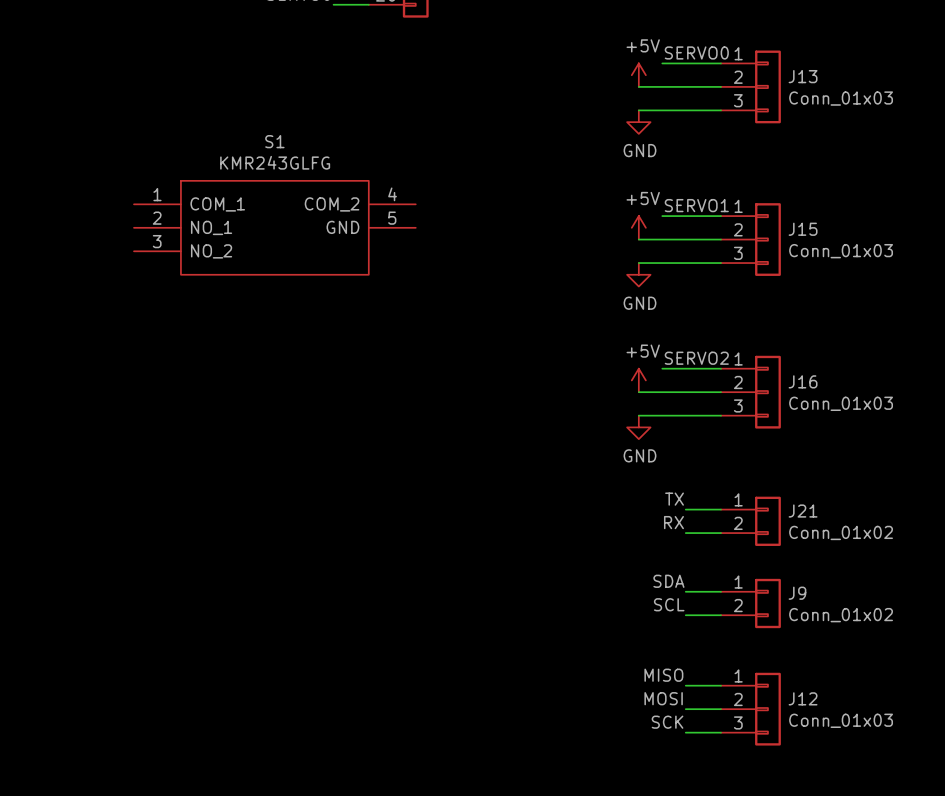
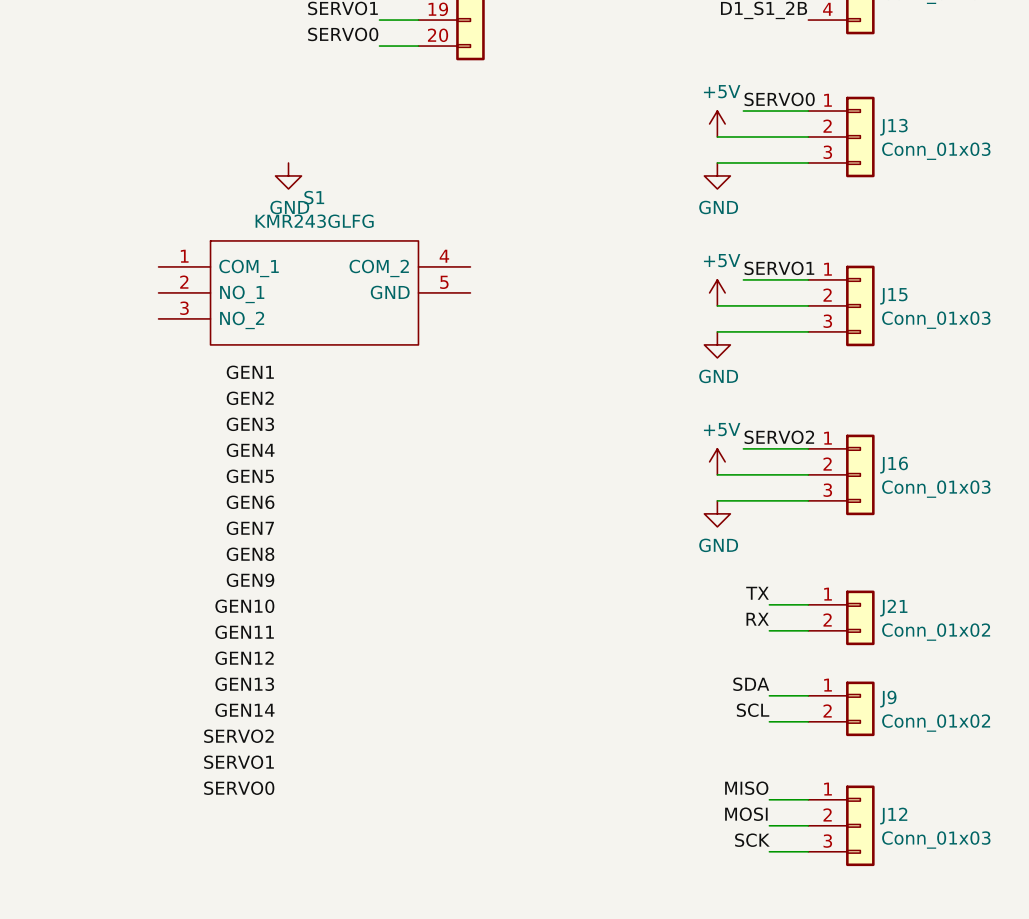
power symbol: none -> GND (288, 175)
label: none -> GEN1 (250, 372)
label: none -> GEN2 (250, 398)
label: none -> GEN3 (250, 424)
label: none -> GEN4 (250, 450)
label: none -> GEN5 (250, 476)
label: none -> GEN6 (250, 502)
label: none -> GEN7 (250, 528)
label: none -> GEN8 (250, 554)
label: none -> GEN9 (250, 580)
label: none -> GEN10 (244, 606)
label: none -> GEN11 (244, 632)
label: none -> GEN12 (244, 658)
label: none -> GEN13 (244, 684)
label: none -> GEN14 (244, 710)
label: none -> SERVO2 (238, 736)
label: none -> SERVO1 (239, 762)
label: none -> SERVO0 (239, 788)

